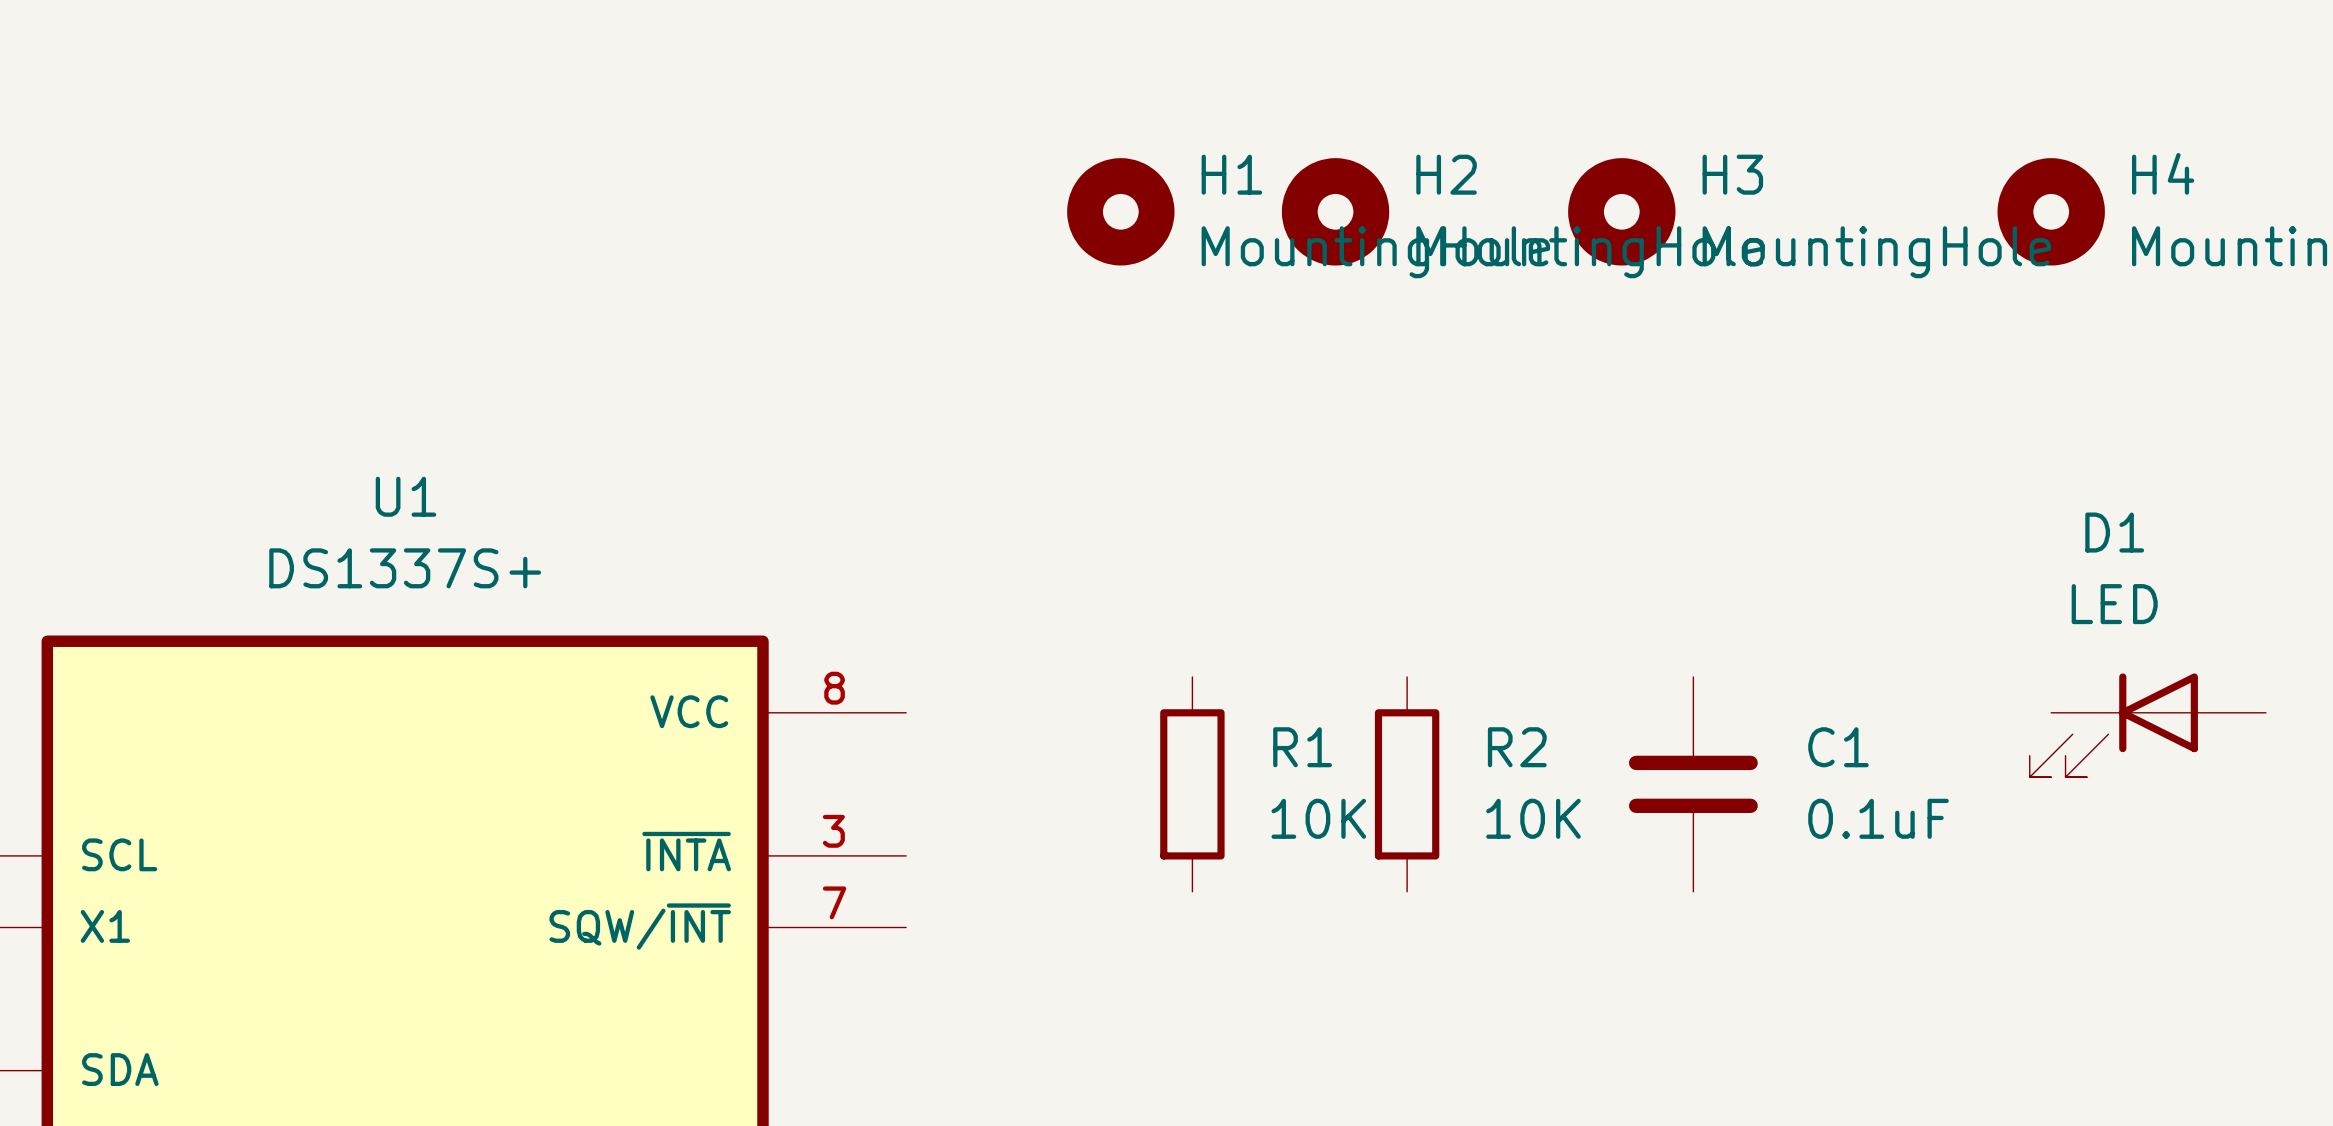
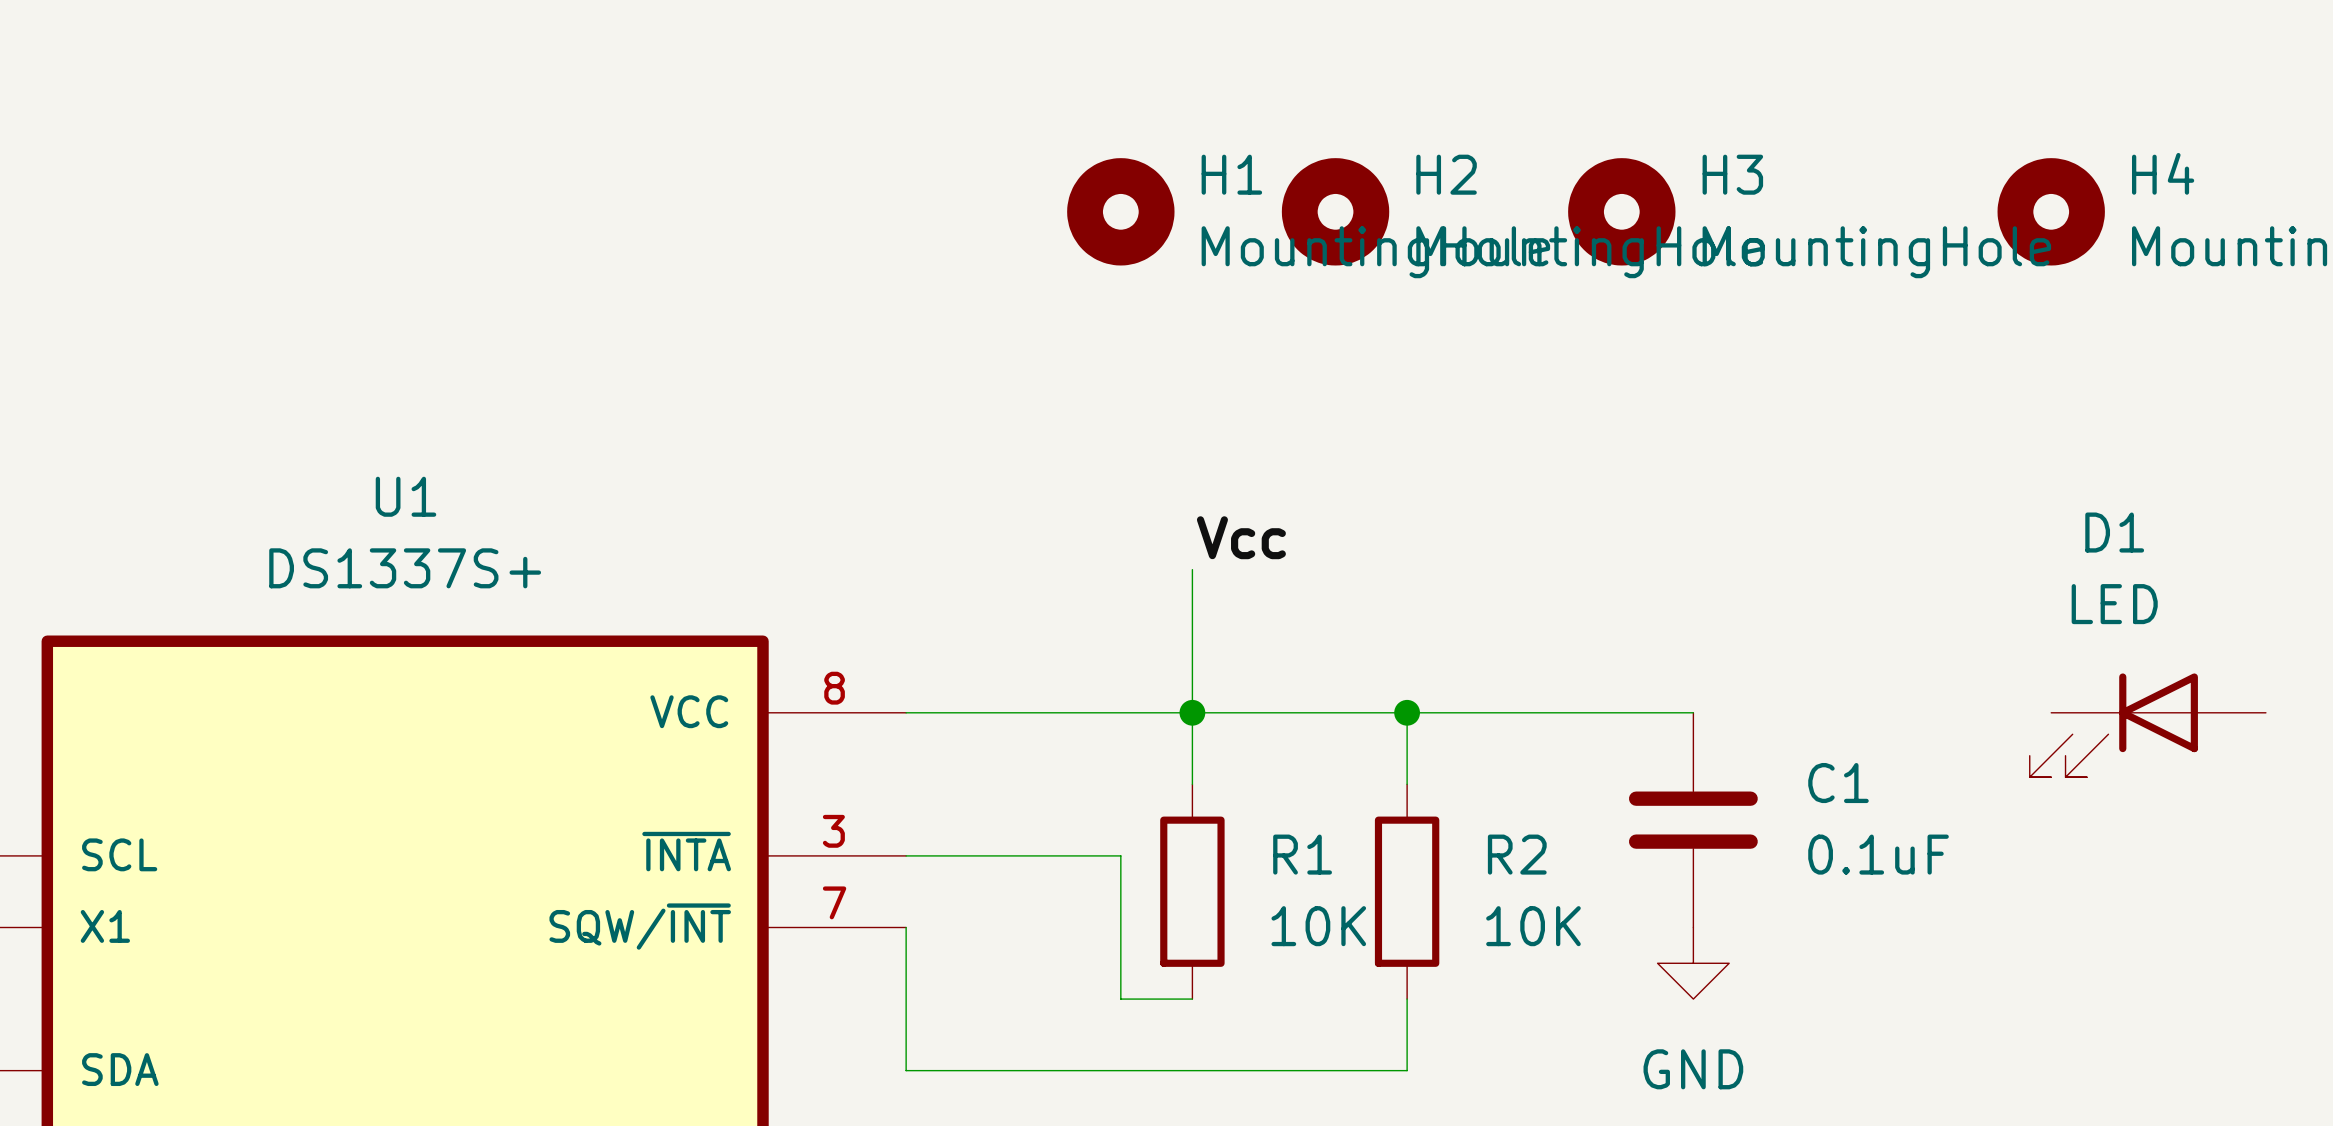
label: none -> Vcc (1241, 537)
wire: none -> (1192, 569) (1192, 784)
wire: none -> (906, 712) (1693, 712)
junction: none -> (1192, 712)
wire: none -> (1407, 712) (1407, 784)
junction: none -> (1407, 712)
R1 position: (1192, 784) -> (1192, 891)
R2 position: (1407, 784) -> (1407, 891)
C1 position: (1693, 784) -> (1693, 820)
wire: none -> (906, 855) (1120, 855) (1120, 999) (1192, 999)
wire: none -> (906, 927) (906, 1070) (1407, 1070) (1407, 999)
power symbol: none -> GND (1693, 963)

